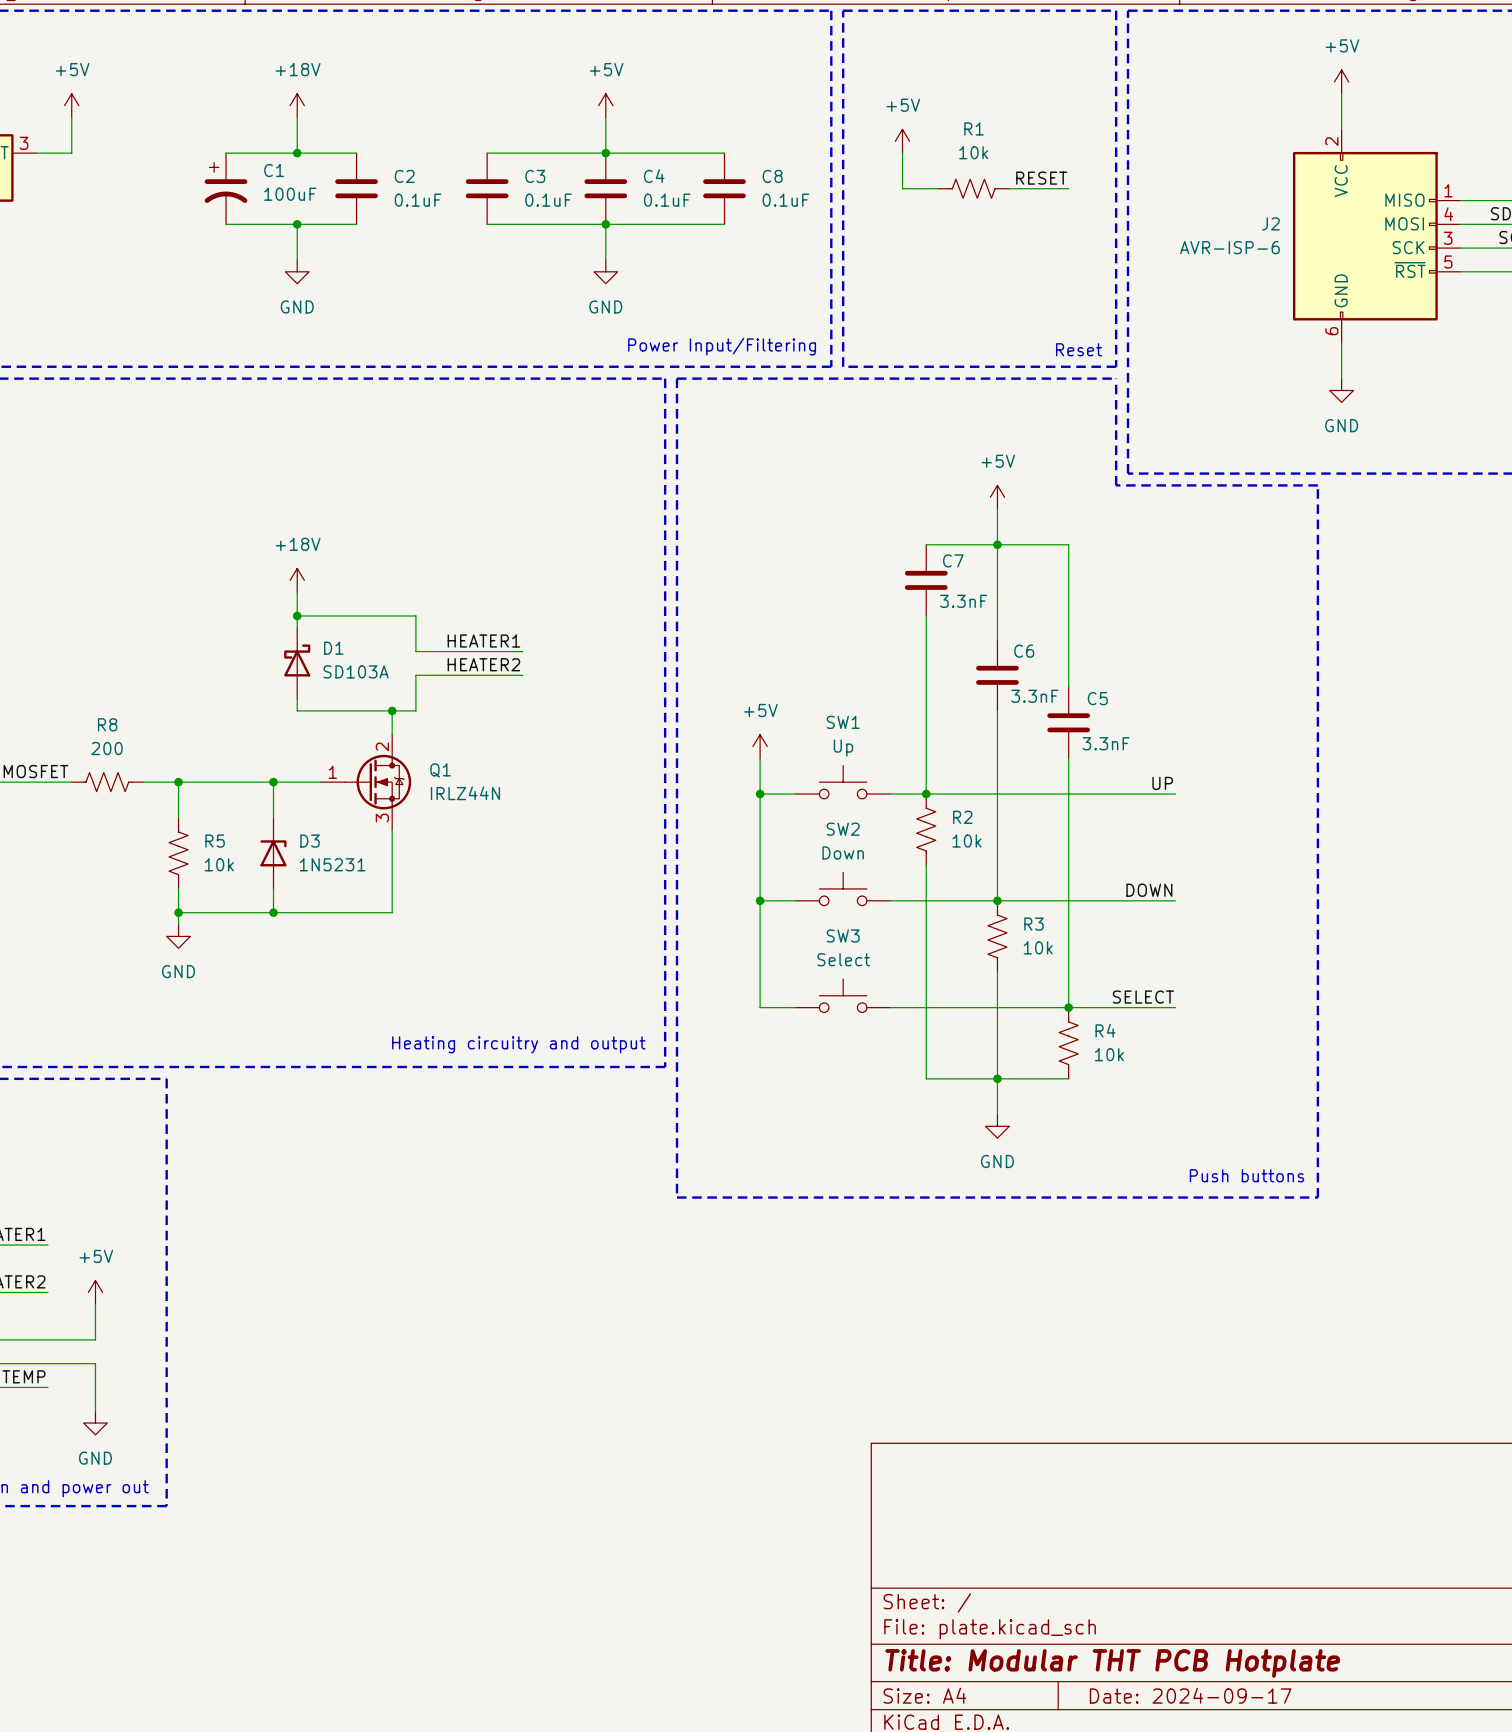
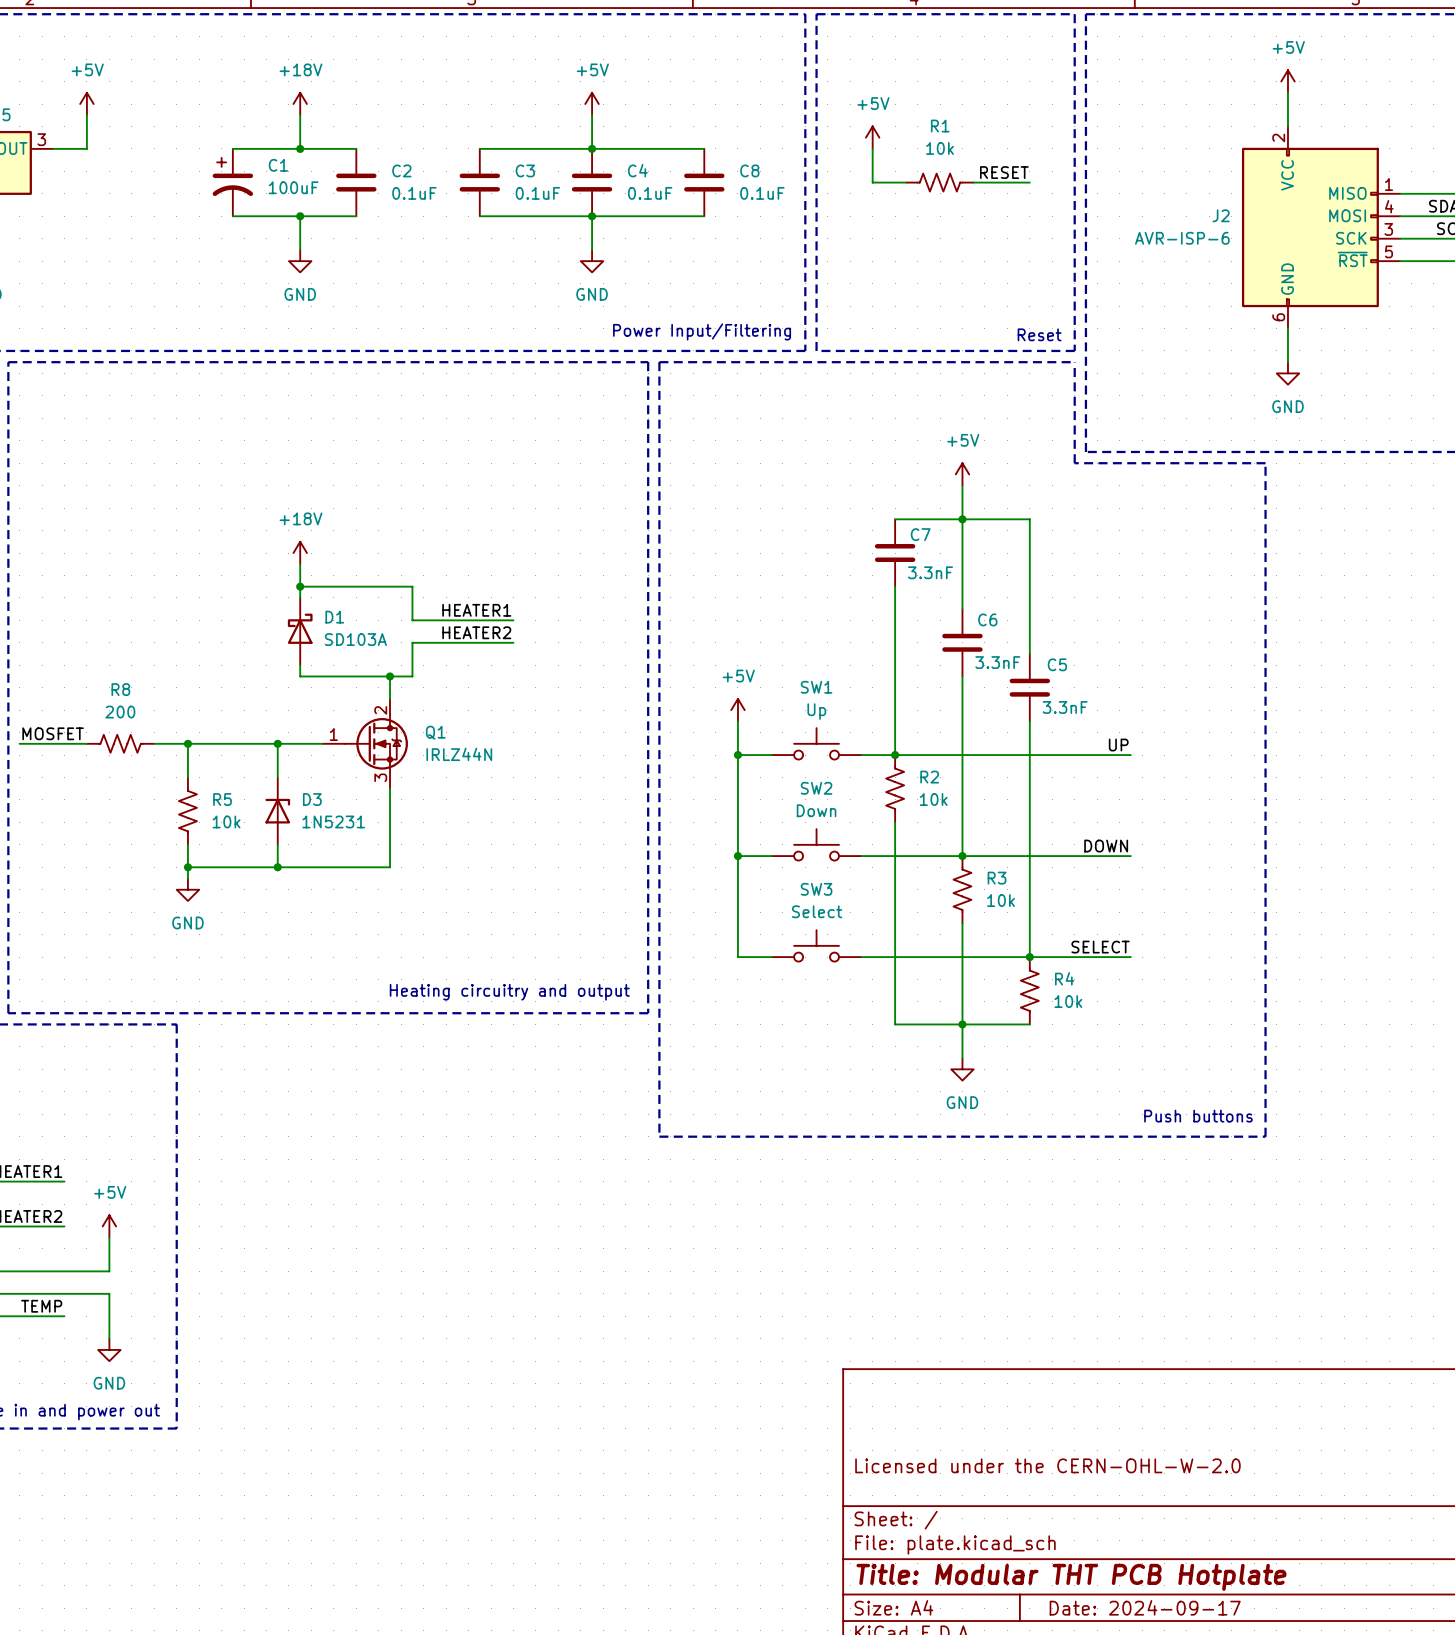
title block: none -> Licensed under the CERN-OHL-W-2.0 (1047, 1465)

